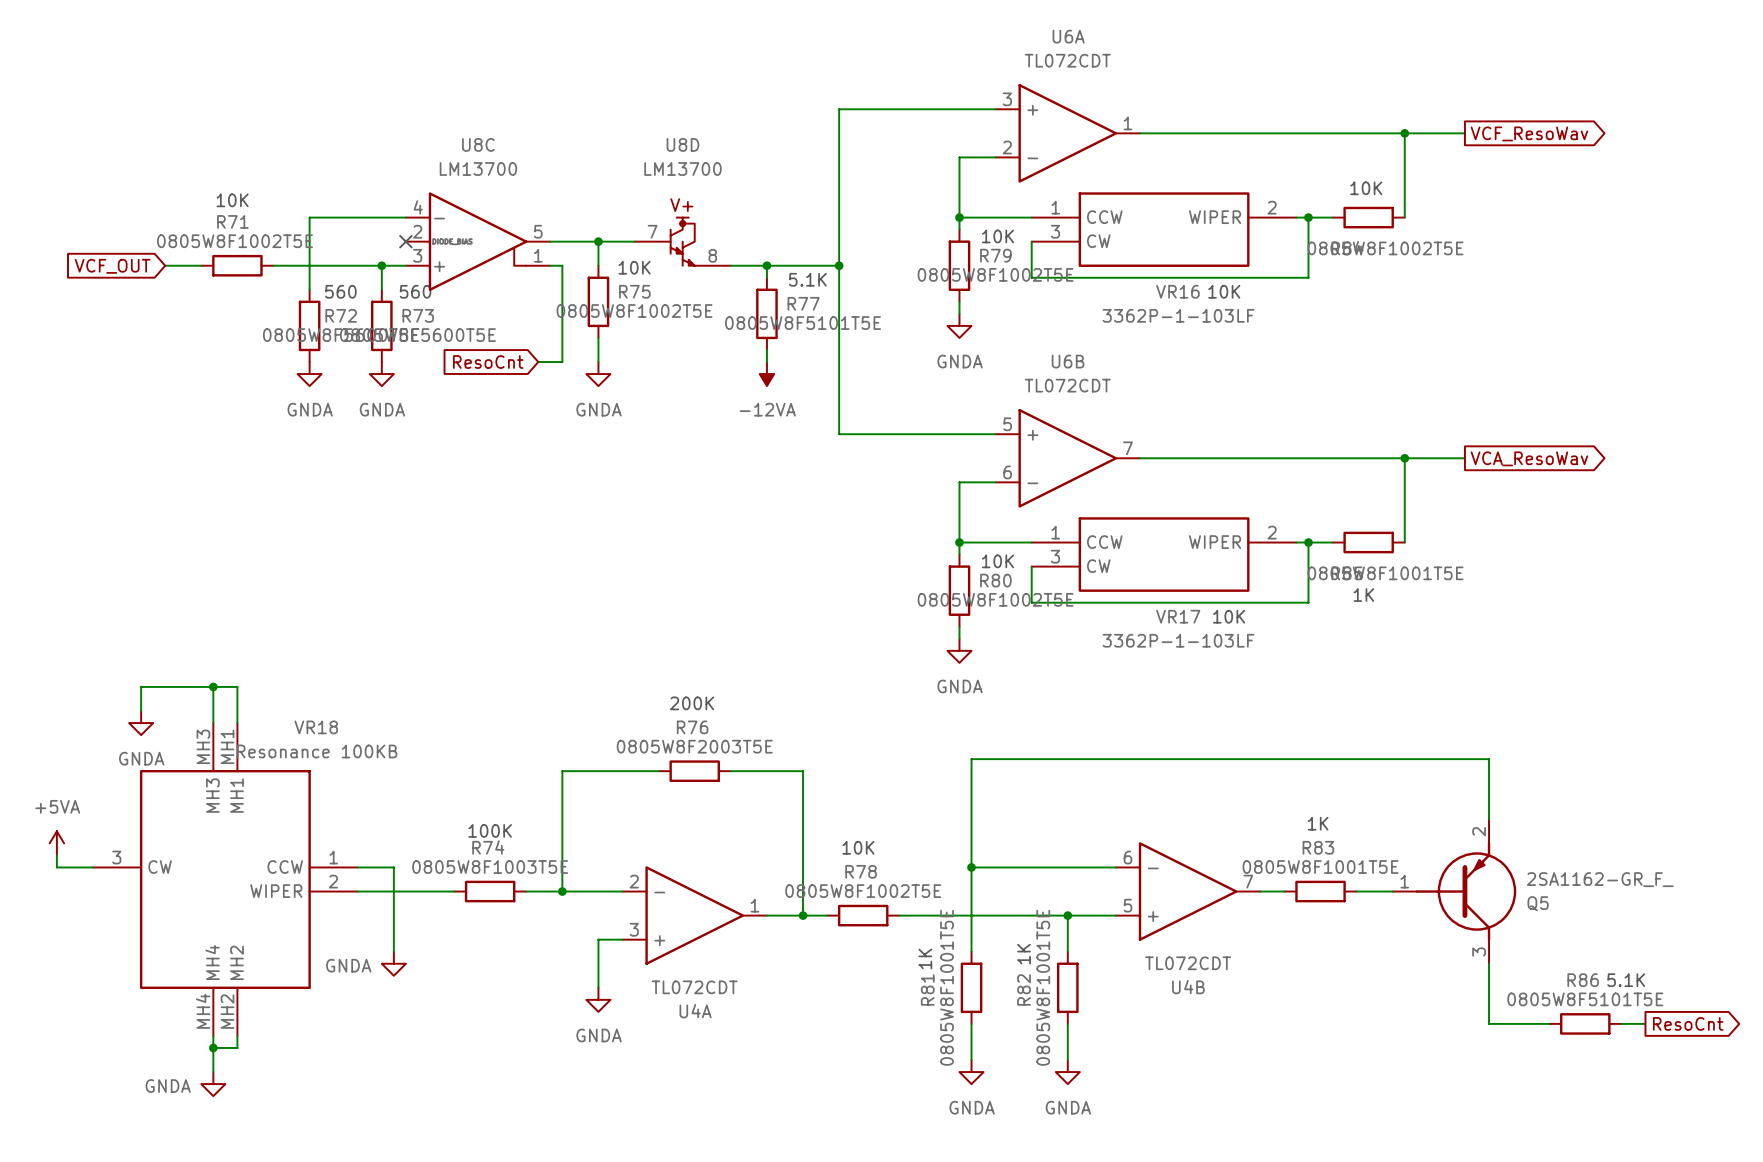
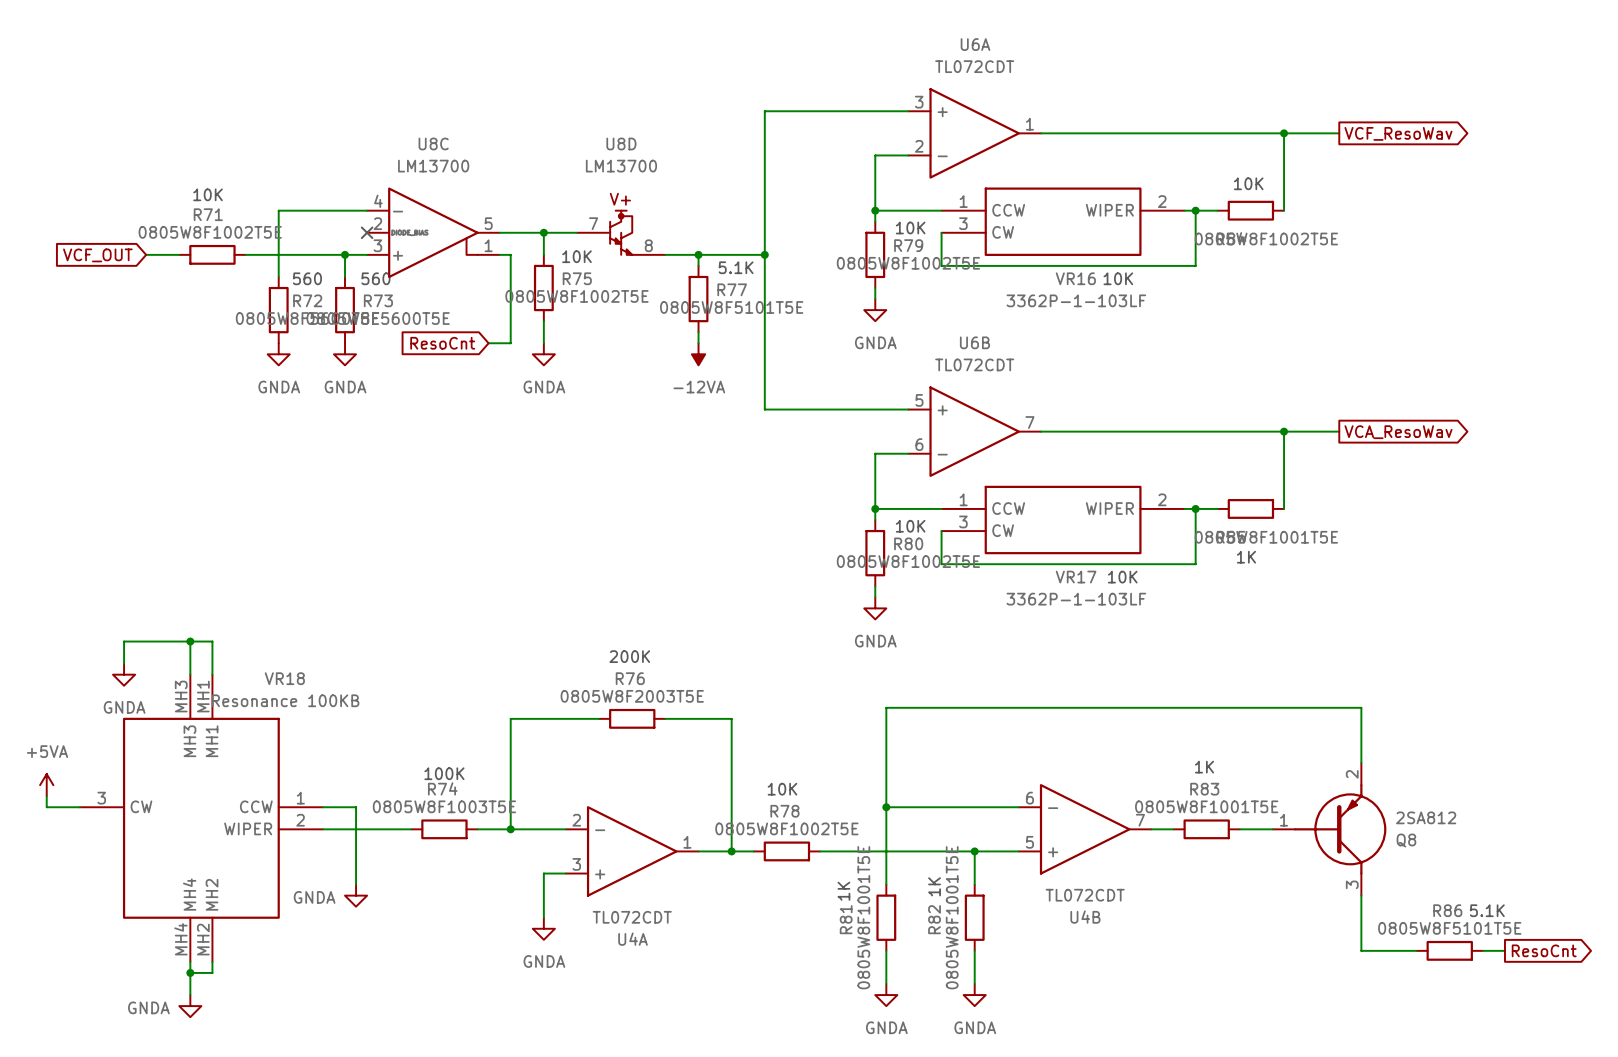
Q5 value: 2SA1162-GR_F_ (1600, 879) -> 2SA812 (1426, 817)
Q5 name: Q5 (1538, 903) -> Q8 (1406, 840)

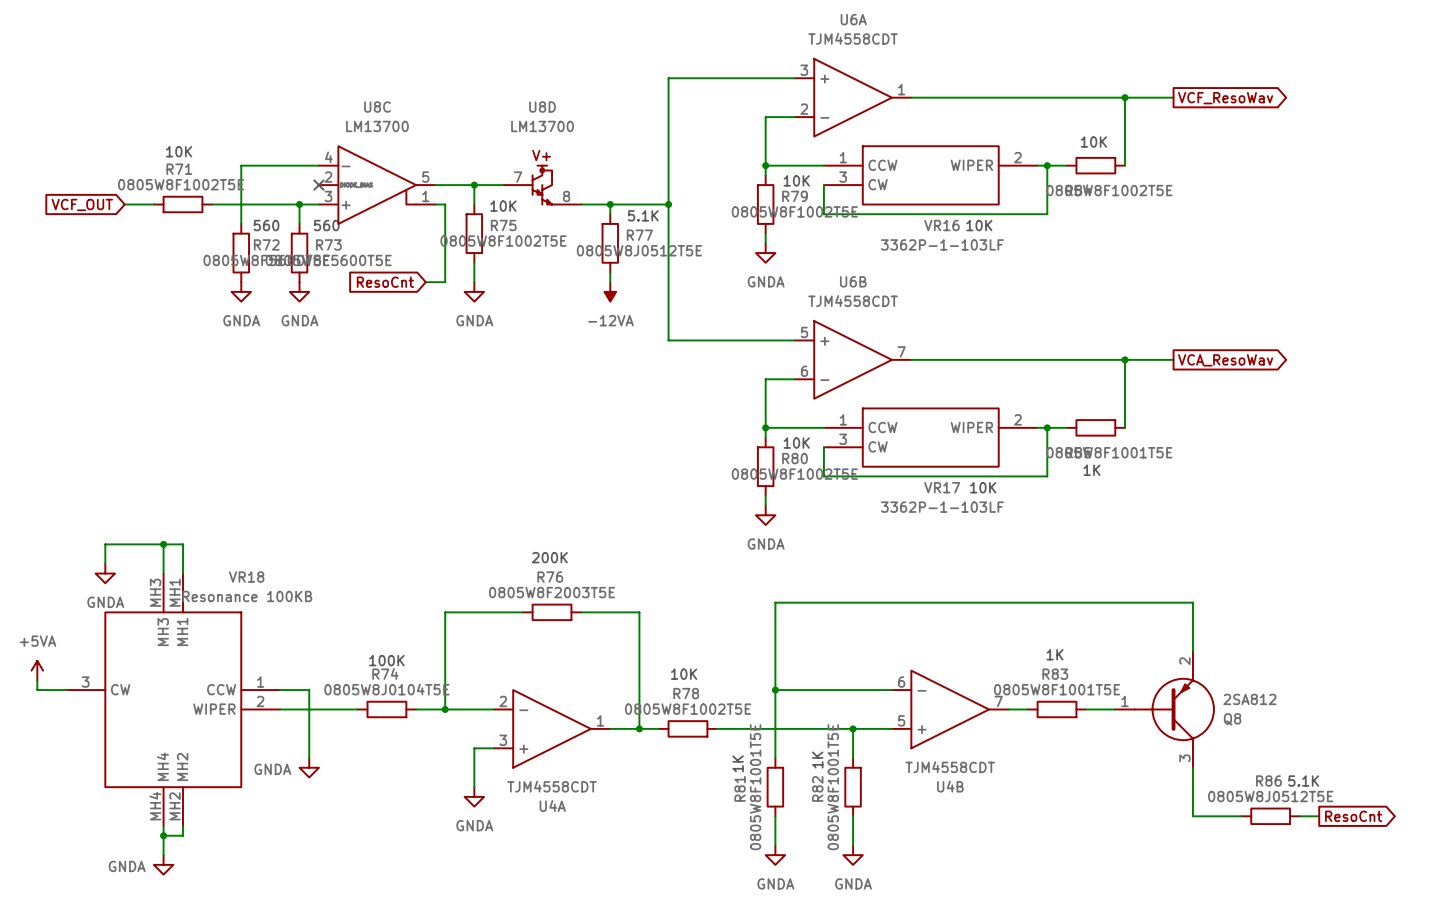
U6A value: TL072CDT (974, 66) -> TJM4558CDT (853, 38)
R77 value: 0805W8F5101T5E (731, 307) -> 0805W8J0512T5E (639, 250)
U6B value: TL072CDT (974, 364) -> TJM4558CDT (853, 301)
R74 value: 0805W8F1003T5E (444, 806) -> 0805W8J0104T5E (386, 689)
U4B value: TL072CDT (1085, 895) -> TJM4558CDT (950, 767)
U4A value: TL072CDT (632, 917) -> TJM4558CDT (552, 786)
R86 value: 0805W8F5101T5E (1449, 928) -> 0805W8J0512T5E (1270, 796)

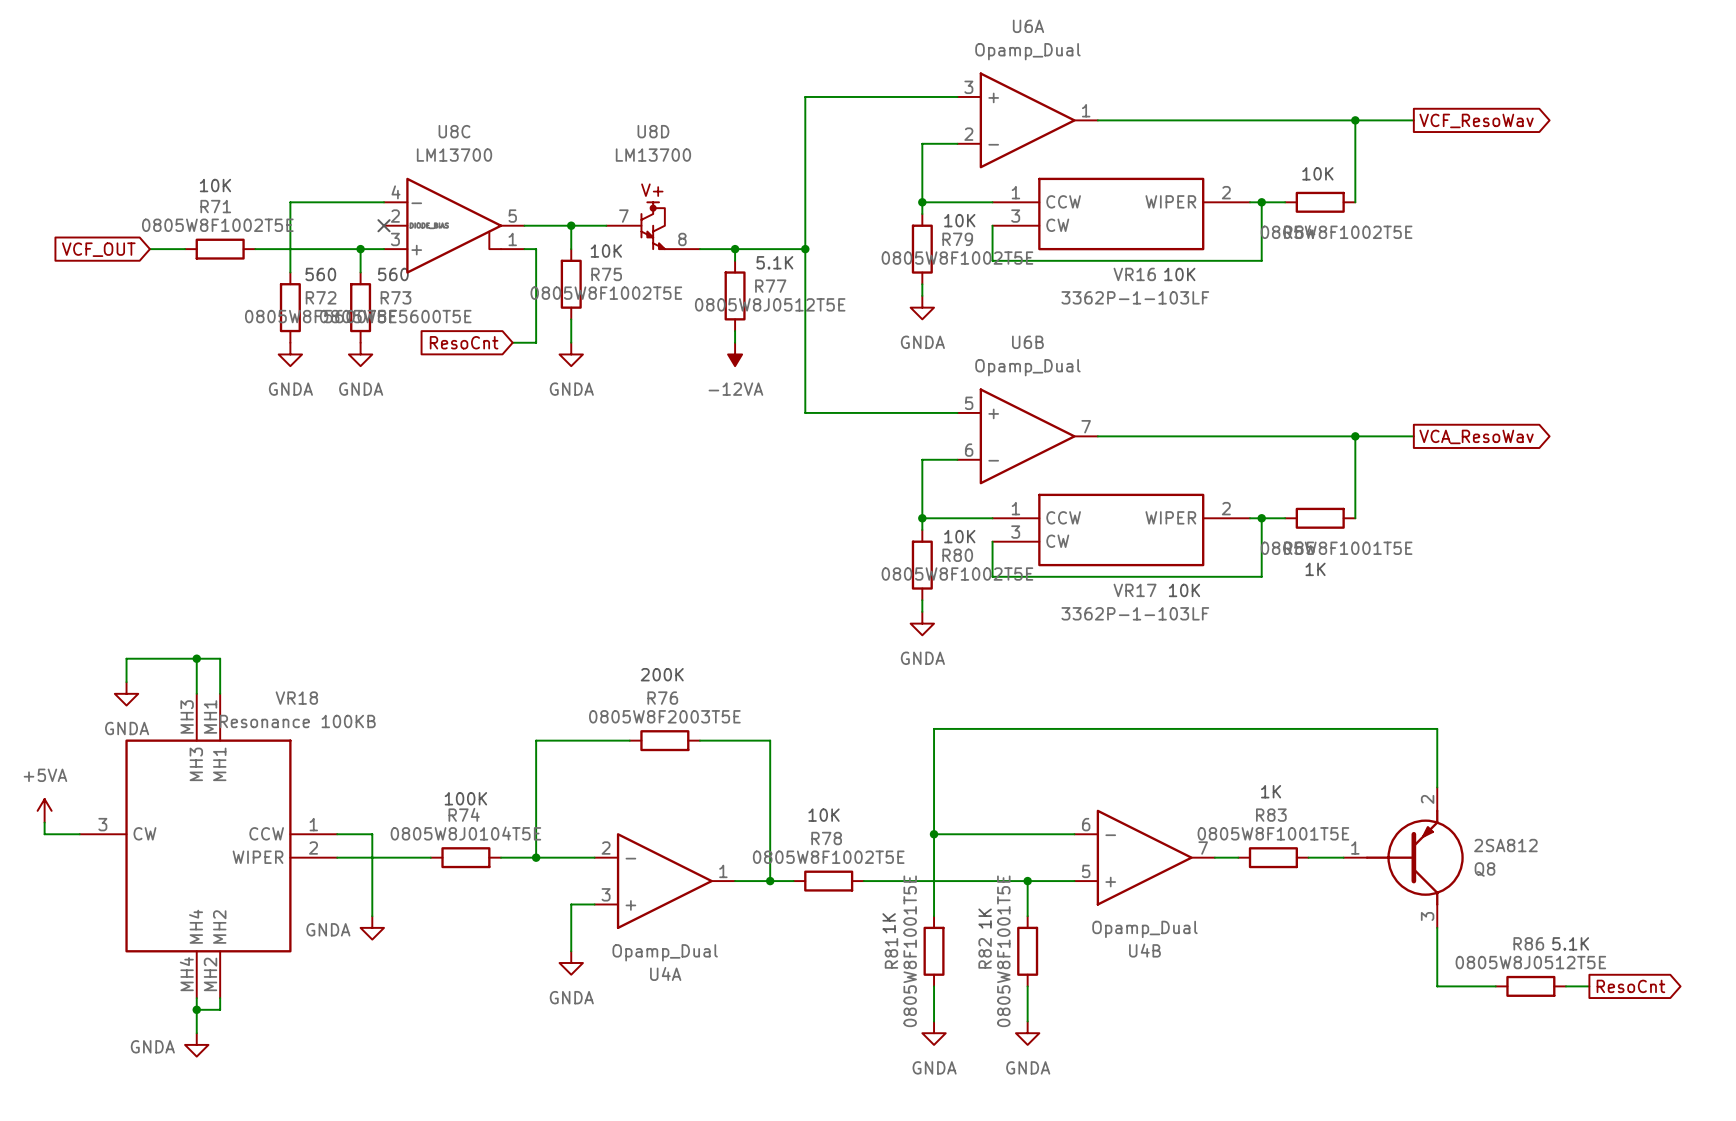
U6A value: TJM4558CDT (853, 38) -> Opamp_Dual (1027, 51)
U6B value: TJM4558CDT (853, 301) -> Opamp_Dual (1027, 367)
U4B value: TJM4558CDT (950, 767) -> Opamp_Dual (1144, 929)
U4A value: TJM4558CDT (552, 786) -> Opamp_Dual (665, 952)

